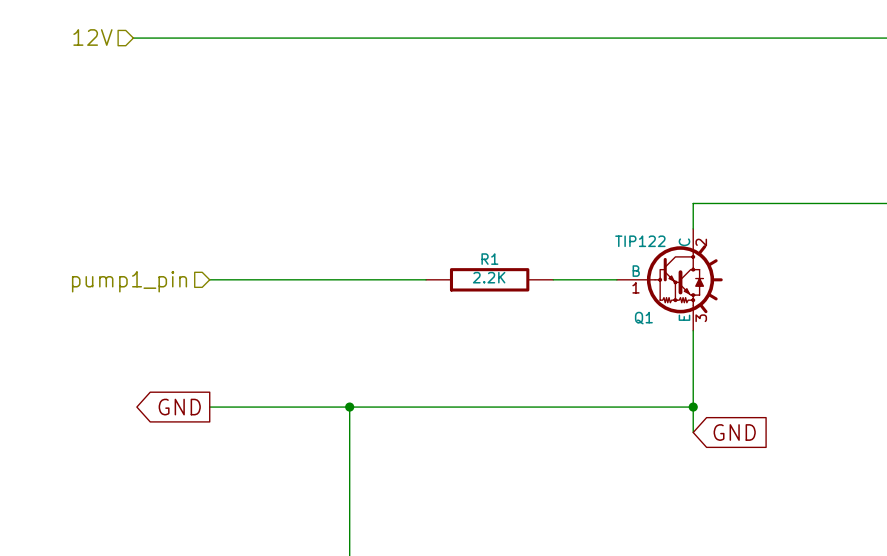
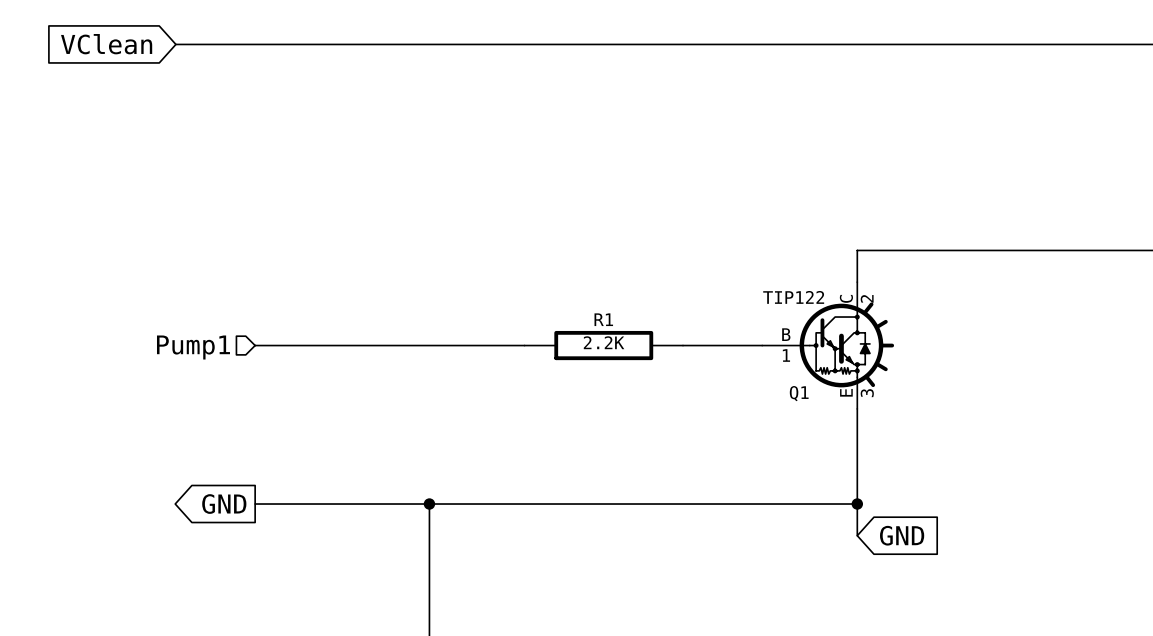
hierarchical label: 12V (92, 37) -> none
global label: none -> VClean (106, 44)
wire: (133, 38) (146, 38) -> none
hierarchical label: pump1_pin (129, 281) -> Pump1 (193, 347)

